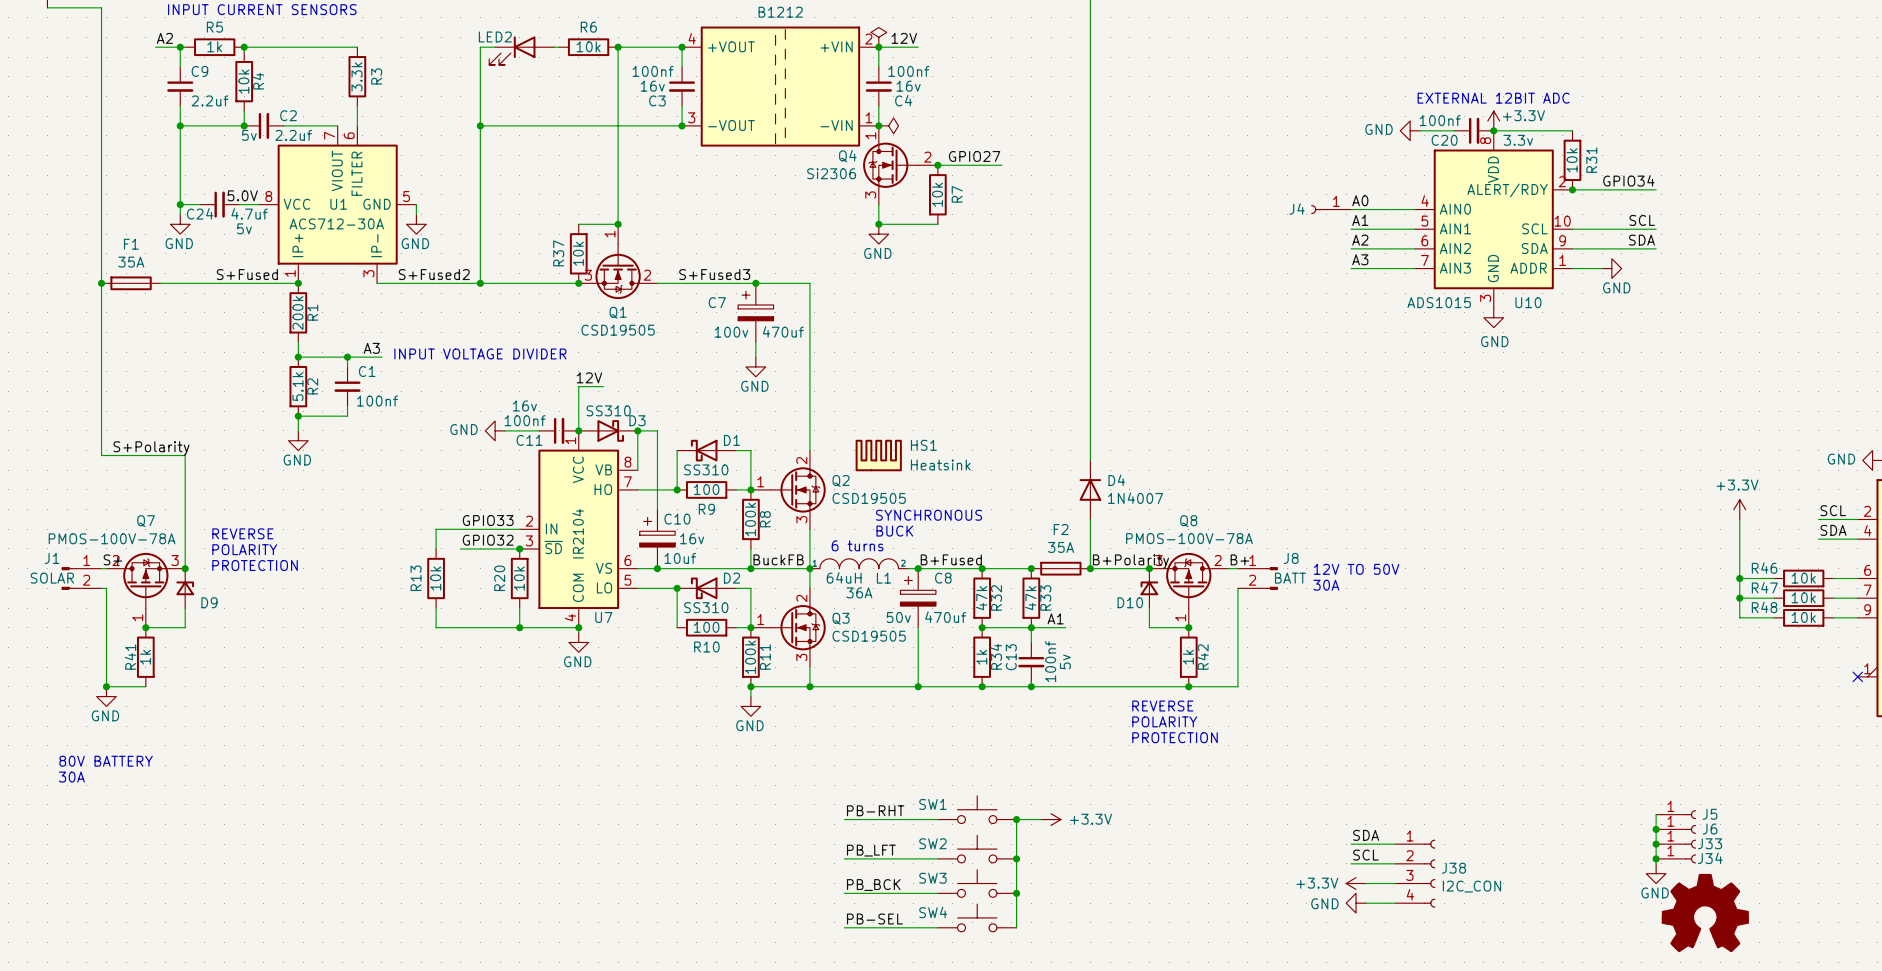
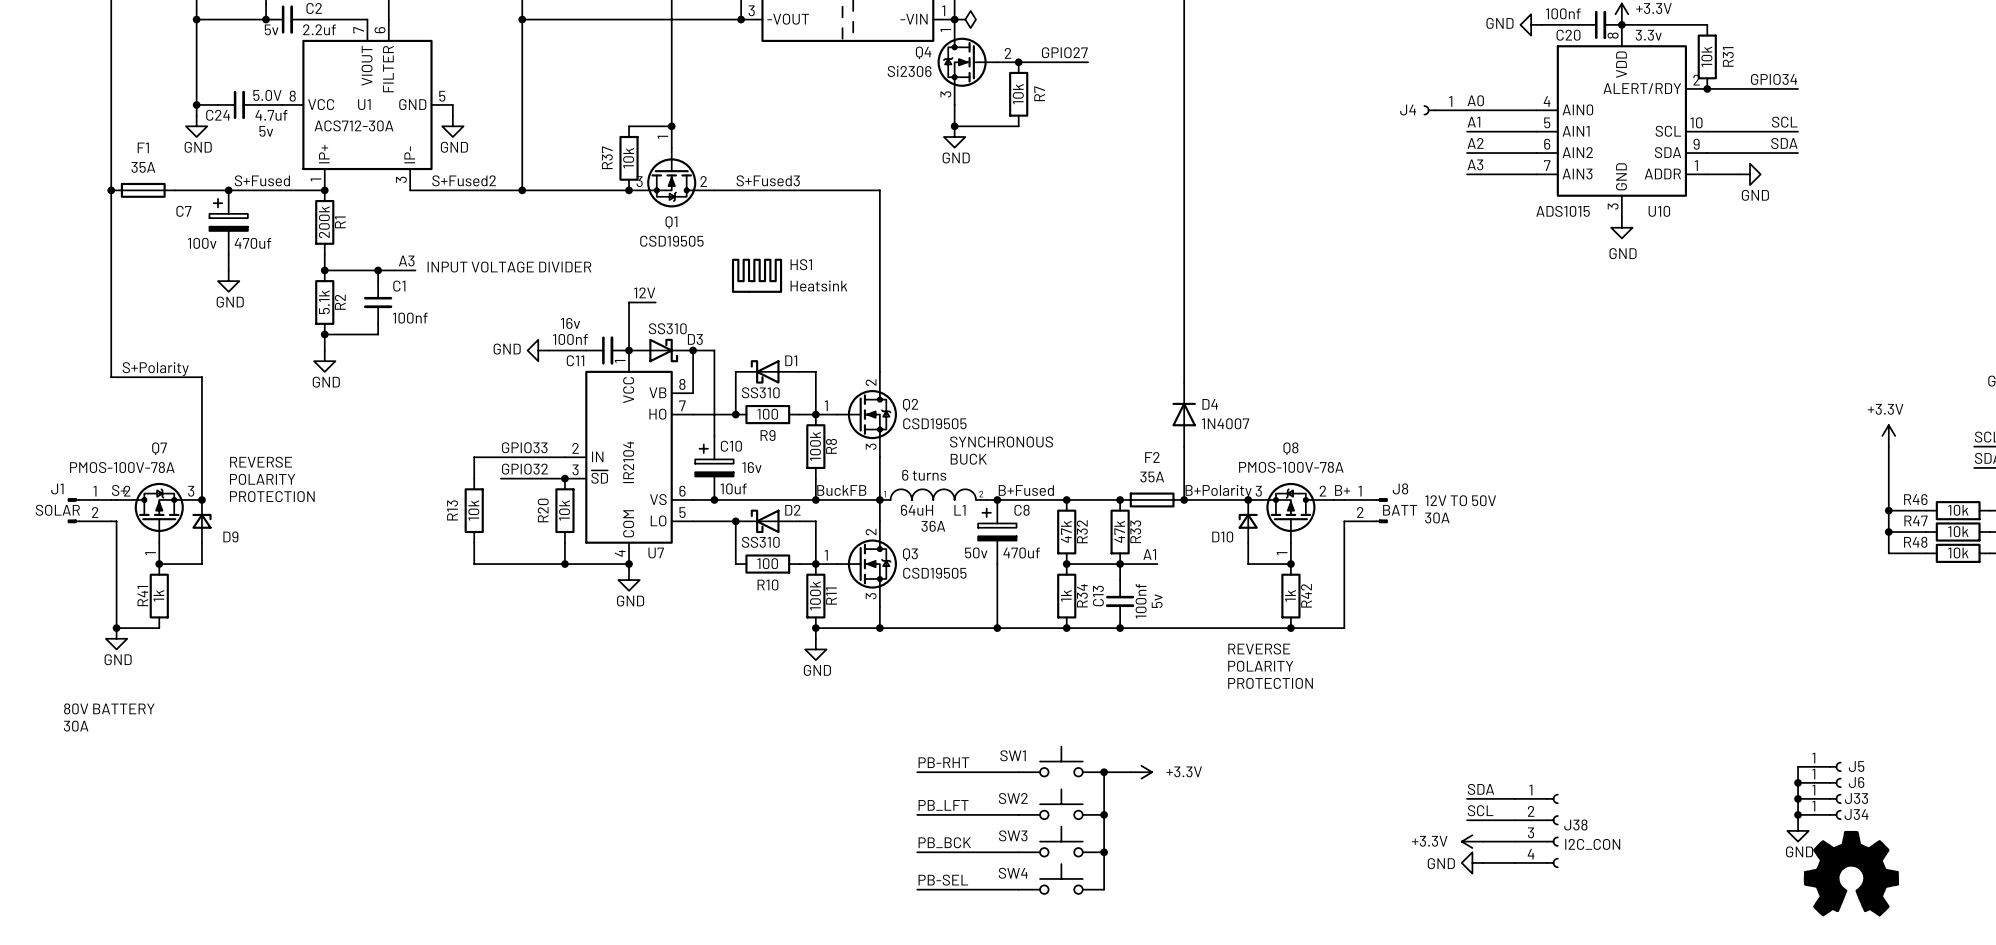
junction: none -> (228, 190)
junction: (755, 283) -> none
C7 position: (755, 312) -> (228, 222)
wire: none -> (228, 254) (228, 270)
wire: (755, 342) (755, 357) -> none
power symbol: none -> GND (228, 281)
power symbol: GND (755, 366) -> none
HS1 position: (878, 455) -> (757, 275)

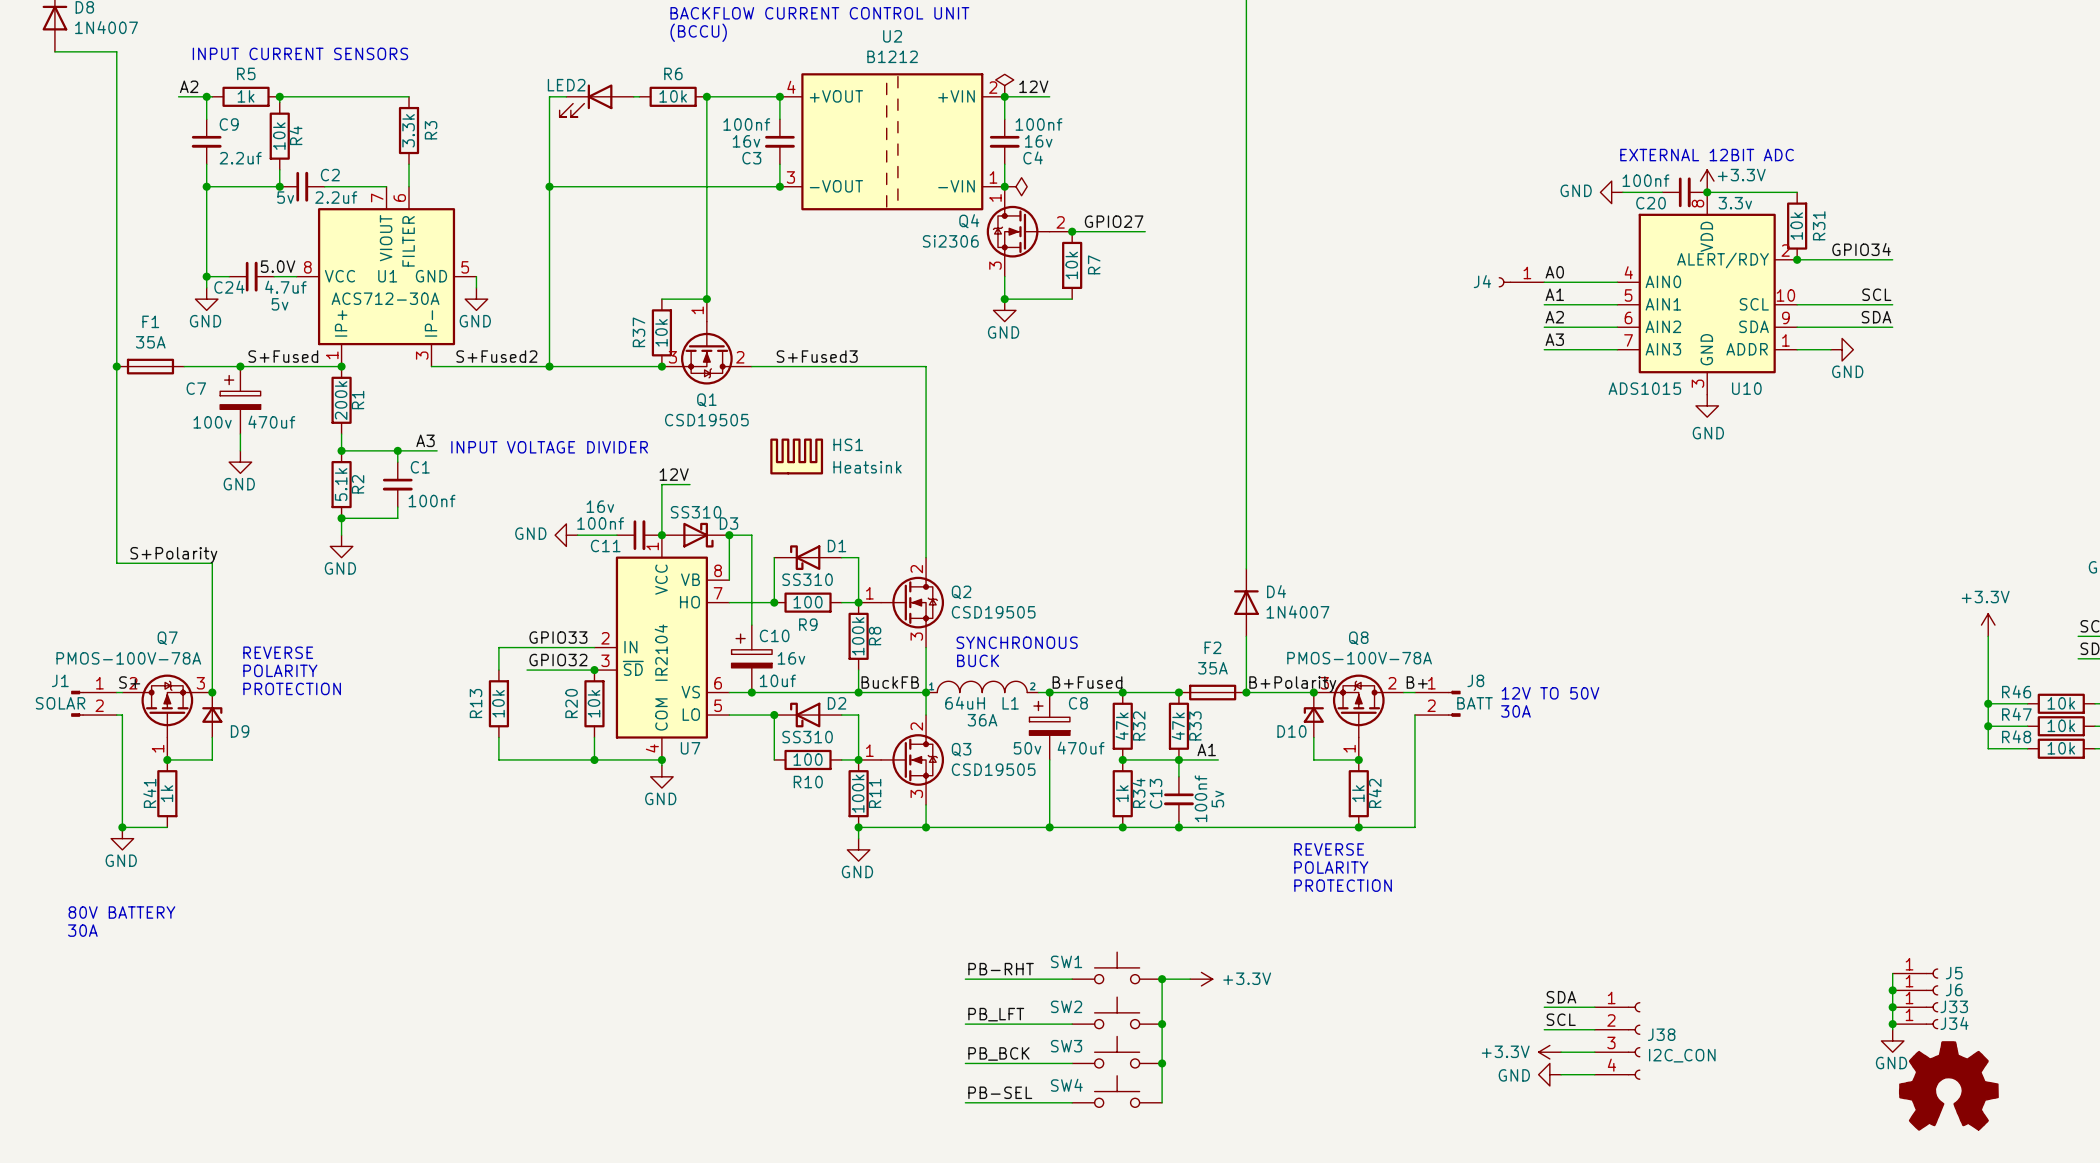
text position: SYNCHRONOUS (1001, 442) -> SYNCHRONOUS (1017, 642)
text: BUCK (968, 459) -> none
text: 6 turns (924, 475) -> BUCK (978, 660)

